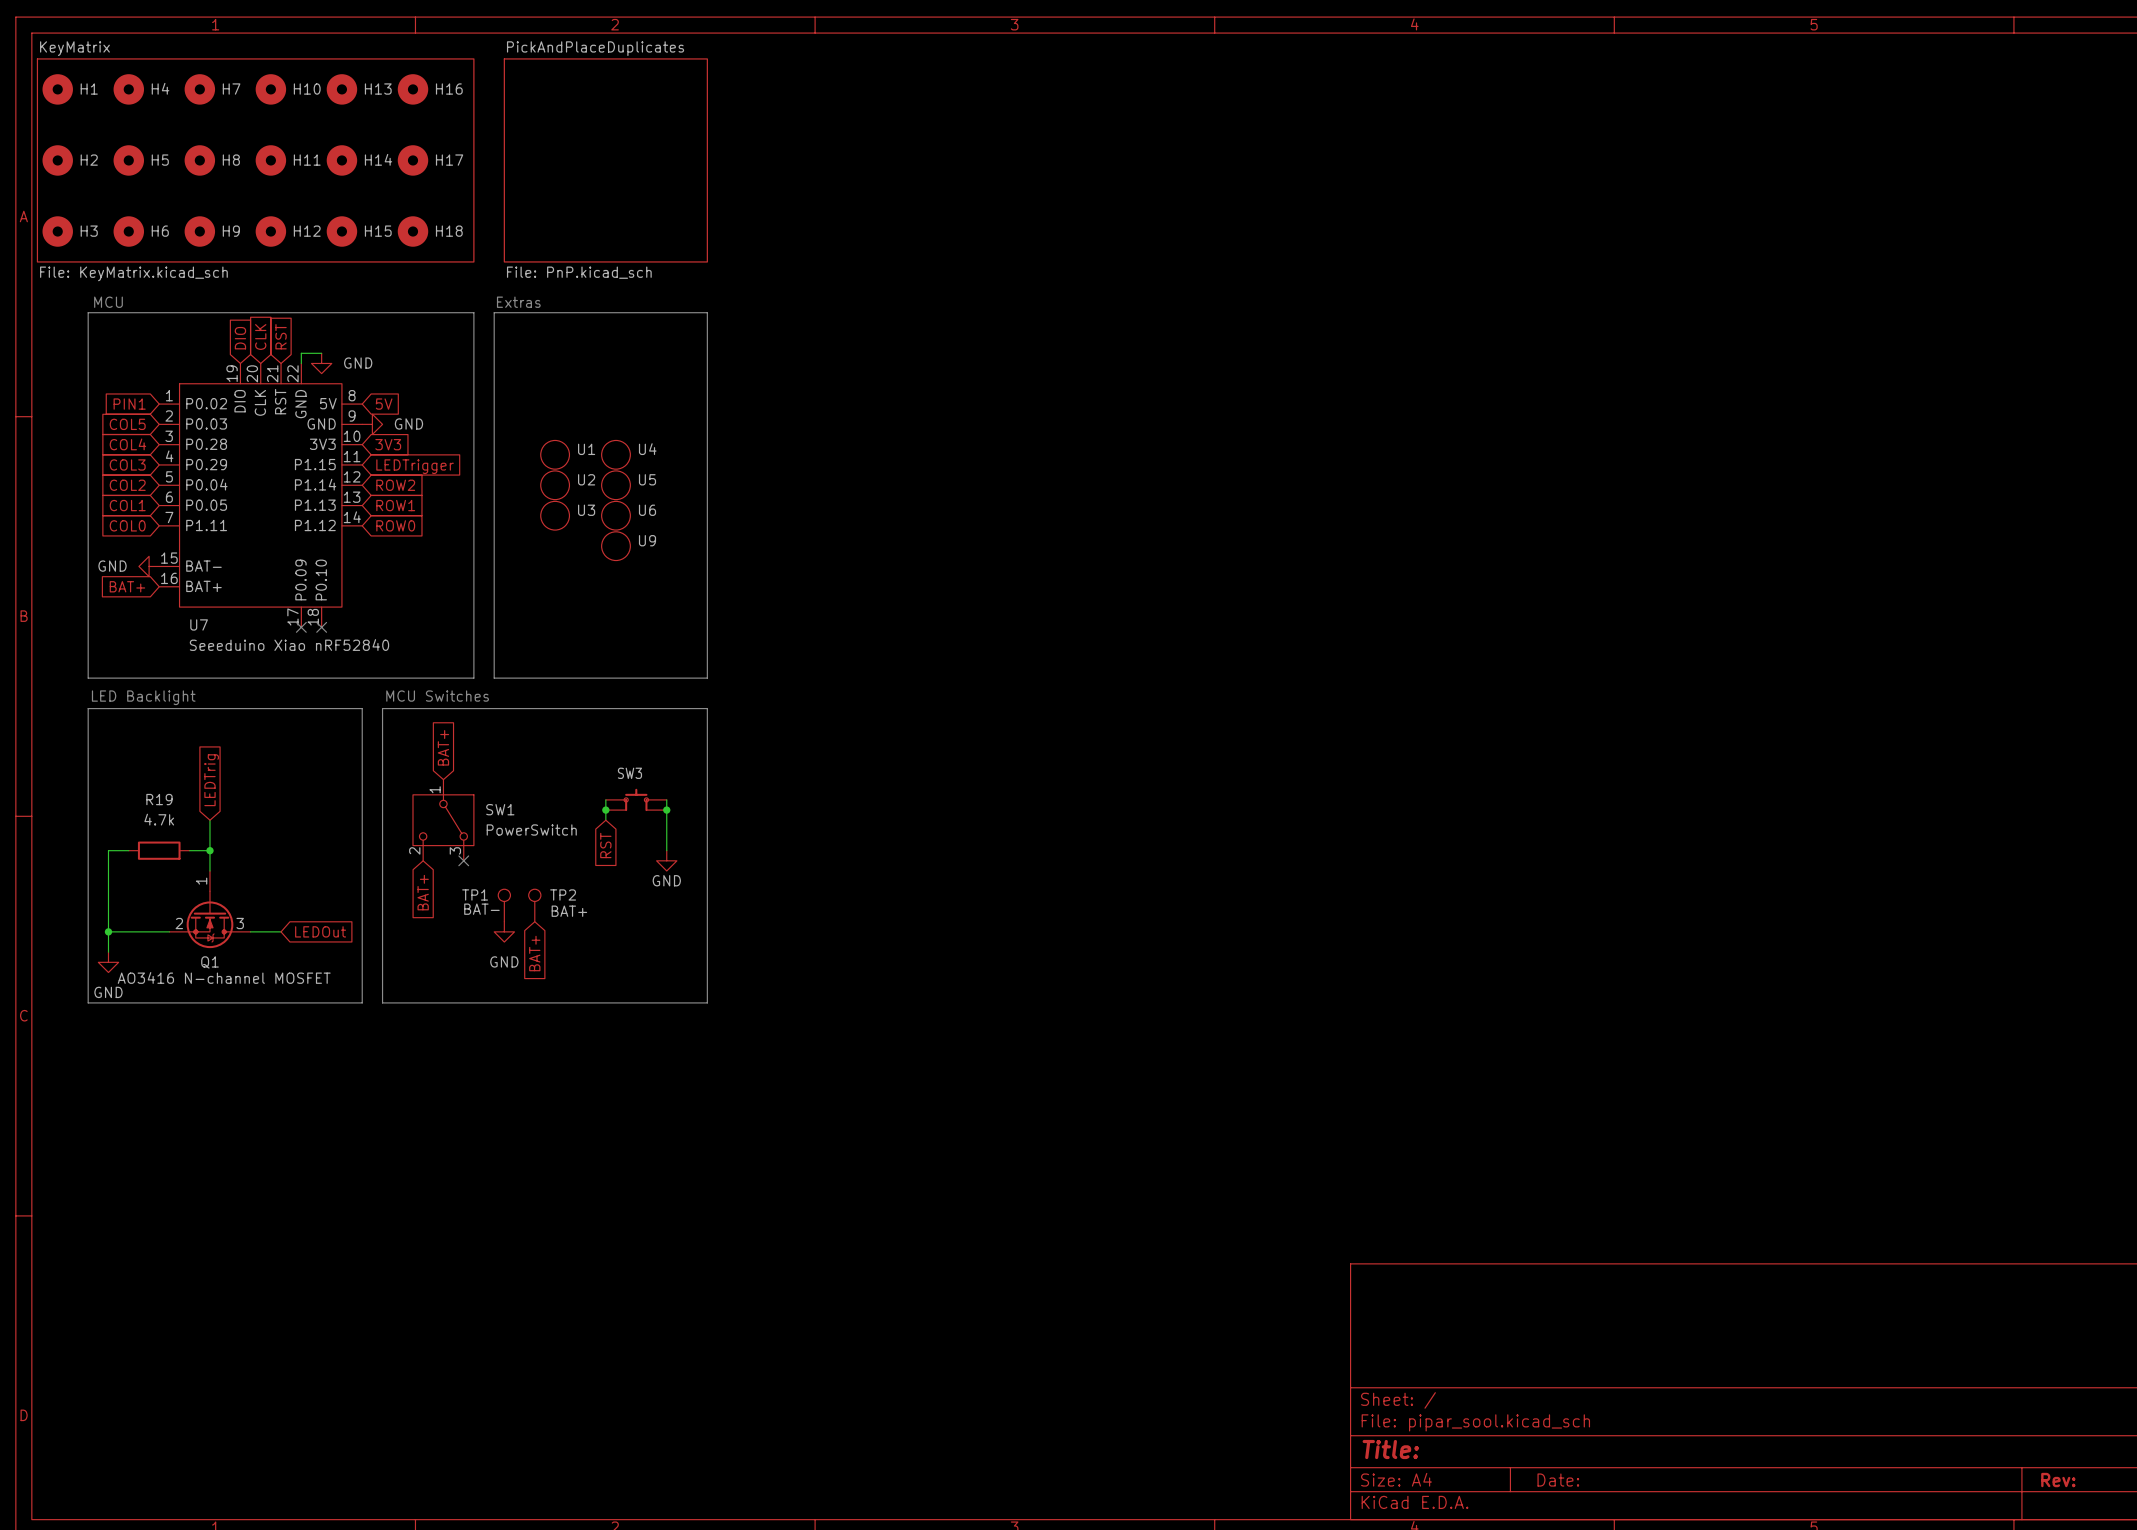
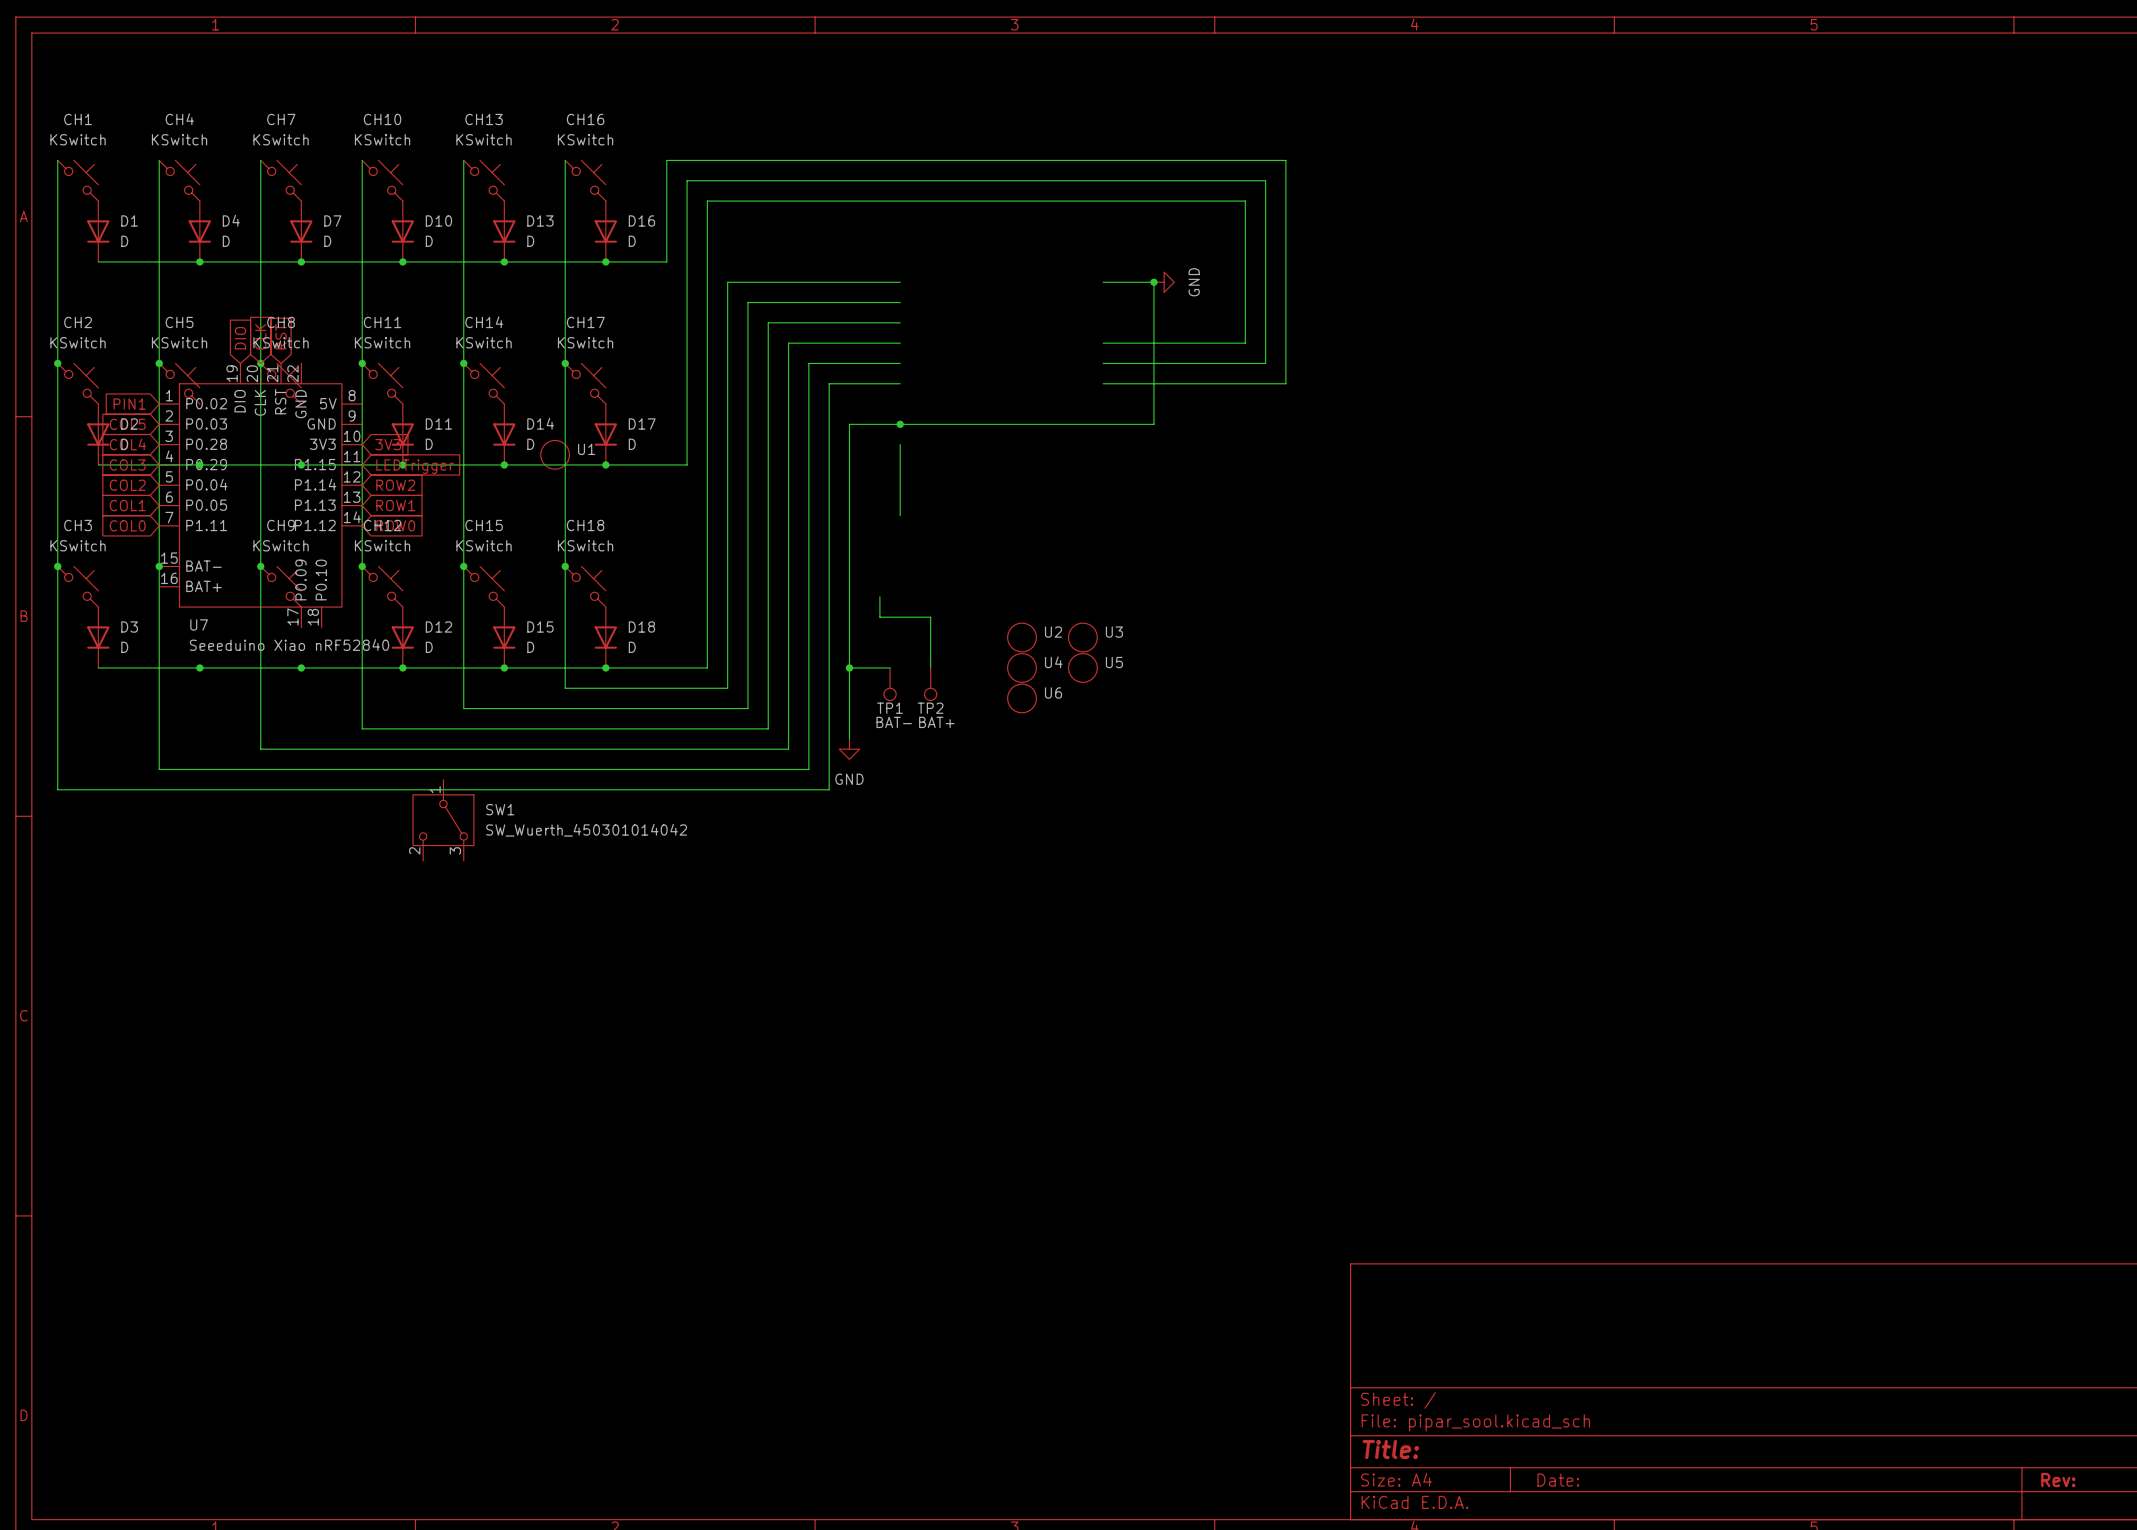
H1: (57, 89) -> none
H4: (128, 89) -> none
H7: (199, 89) -> none
H10: (270, 89) -> none
H13: (341, 89) -> none
H16: (412, 89) -> none
wire: none -> (57, 160) (57, 789) (829, 789) (829, 383) (900, 383)
H2: (57, 160) -> none
H5: (128, 160) -> none
wire: none -> (159, 160) (159, 769) (808, 769) (808, 363) (900, 363)
H8: (199, 160) -> none
sheet KeyMatrix: File: KeyMatrix.kicad_sch (255, 160) -> none
wire: none -> (260, 160) (260, 749) (788, 749) (788, 343) (900, 343)
H11: (270, 160) -> none
H14: (341, 160) -> none
wire: none -> (362, 160) (362, 728) (768, 728) (768, 322) (900, 322)
H17: (412, 160) -> none
wire: none -> (463, 160) (463, 708) (747, 708) (747, 302) (900, 302)
wire: none -> (565, 160) (565, 688) (727, 688) (727, 282) (900, 282)
sheet PickAndPlaceDuplicates: File: PnP.kicad_sch (605, 160) -> none
CH1: none -> KSwitch (78, 180)
CH4: none -> KSwitch (179, 180)
CH7: none -> KSwitch (281, 180)
CH10: none -> KSwitch (382, 180)
CH13: none -> KSwitch (484, 180)
CH16: none -> KSwitch (585, 180)
H3: (57, 231) -> none
D1: none -> D (98, 231)
H6: (128, 231) -> none
H9: (199, 231) -> none
D4: none -> D (199, 231)
H12: (270, 231) -> none
D7: none -> D (301, 231)
H15: (341, 231) -> none
D10: none -> D (402, 231)
H18: (412, 231) -> none
D13: none -> D (504, 231)
D16: none -> D (605, 231)
wire: none -> (98, 261) (666, 261) (666, 160) (1285, 160) (1285, 383) (1103, 383)
junction: none -> (199, 261)
junction: none -> (301, 261)
junction: none -> (402, 261)
junction: none -> (504, 261)
junction: none -> (605, 261)
wire: none -> (1103, 282) (1153, 282) (1153, 424) (849, 424) (849, 739)
junction: none -> (1153, 282)
power symbol: none -> GND (1164, 282)
text: MCU (108, 302) -> none
text: Extras (518, 302) -> none
line: (88, 312) (88, 678) (473, 678) (473, 312) (88, 312) -> none
line: (494, 312) (707, 312) (707, 678) (494, 678) (494, 312) -> none
wire: none -> (1103, 343) (1245, 343) (1245, 201) (707, 201) (707, 667) (98, 667)
wire: (321, 353) (301, 353) (301, 363) -> none
junction: none -> (57, 363)
junction: none -> (159, 363)
junction: none -> (260, 363)
power symbol: GND (321, 363) -> none
junction: none -> (362, 363)
junction: none -> (463, 363)
junction: none -> (565, 363)
wire: none -> (1103, 363) (1265, 363) (1265, 180) (687, 180) (687, 464) (98, 464)
CH2: none -> KSwitch (78, 383)
CH5: none -> KSwitch (179, 383)
CH8: none -> KSwitch (281, 383)
CH11: none -> KSwitch (382, 383)
CH14: none -> KSwitch (484, 383)
CH17: none -> KSwitch (585, 383)
global label: 5V (384, 404) -> none
power symbol: GND (372, 424) -> none
junction: none -> (900, 424)
D2: none -> D (98, 434)
D11: none -> D (402, 434)
D14: none -> D (504, 434)
D17: none -> D (605, 434)
wire: none -> (900, 444) (900, 515)
U4 position: (616, 454) -> (1022, 667)
junction: none -> (199, 464)
junction: none -> (301, 464)
junction: none -> (402, 464)
junction: none -> (504, 464)
junction: none -> (605, 464)
U2 position: (555, 485) -> (1022, 637)
U5 position: (616, 485) -> (1082, 667)
U3 position: (555, 515) -> (1082, 637)
U6 position: (616, 515) -> (1022, 698)
U9: (616, 546) -> none
junction: none -> (57, 566)
power symbol: GND (149, 566) -> none
junction: none -> (159, 566)
junction: none -> (260, 566)
junction: none -> (362, 566)
junction: none -> (463, 566)
junction: none -> (565, 566)
CH3: none -> KSwitch (78, 586)
global label: BAT+ (127, 586) -> none
CH9: none -> KSwitch (281, 586)
CH12: none -> KSwitch (382, 586)
CH15: none -> KSwitch (484, 586)
CH18: none -> KSwitch (585, 586)
wire: none -> (879, 596) (879, 617) (930, 617) (930, 667)
no-connect mark: (301, 627) -> none
no-connect mark: (321, 627) -> none
D3: none -> D (98, 637)
D12: none -> D (402, 637)
D15: none -> D (504, 637)
D18: none -> D (605, 637)
junction: none -> (199, 667)
junction: none -> (301, 667)
junction: none -> (402, 667)
junction: none -> (504, 667)
junction: none -> (605, 667)
wire: none -> (849, 667) (890, 667)
junction: none -> (849, 667)
text: MCU Switches (437, 696) -> none
text: LED Backlight (143, 697) -> none
line: (88, 708) (362, 708) (362, 1002) (88, 1002) (88, 708) -> none
line: (382, 708) (707, 708) (707, 1002) (382, 1002) (382, 708) -> none
global label: BAT+ (443, 747) -> none
power symbol: none -> GND (849, 749)
global label: LEDTrig (211, 780) -> none
wire: (605, 799) (605, 820) -> none
SW3: (636, 799) -> none
wire: (666, 799) (666, 850) -> none
junction: (605, 810) -> none
junction: (666, 810) -> none
wire: (209, 820) (209, 870) -> none
SW1 value: PowerSwitch (531, 830) -> SW_Wuerth_450301014042 (586, 830)
global label: RST (605, 845) -> none
wire: (128, 850) (108, 850) (108, 952) -> none
R19: 4.7k (159, 850) -> none
wire: (189, 850) (209, 850) -> none
junction: (209, 850) -> none
no-connect mark: (463, 860) -> none
power symbol: GND (666, 860) -> none
global label: BAT+ (423, 892) -> none
TP1 name position: TP1 (475, 894) -> TP1 (889, 708)
TP2 name position: TP2 (563, 894) -> TP2 (930, 708)
TP1 rotation: 0° (504, 895) -> 180° (890, 694)
TP2 rotation: 0° (534, 895) -> 180° (930, 694)
TP1 position: (504, 905) -> (890, 684)
TP2 position: (534, 905) -> (930, 684)
Q1: AO3416 N-channel MOSFET (209, 909) -> none
TP1 value position: BAT- (481, 909) -> BAT- (894, 722)
TP2 value position: BAT+ (569, 911) -> BAT+ (936, 722)
wire: (108, 931) (169, 931) -> none
junction: (108, 931) -> none
wire: (250, 931) (281, 931) -> none
global label: LEDOut (320, 931) -> none
power symbol: GND (504, 931) -> none
global label: BAT+ (534, 953) -> none
power symbol: GND (108, 962) -> none

